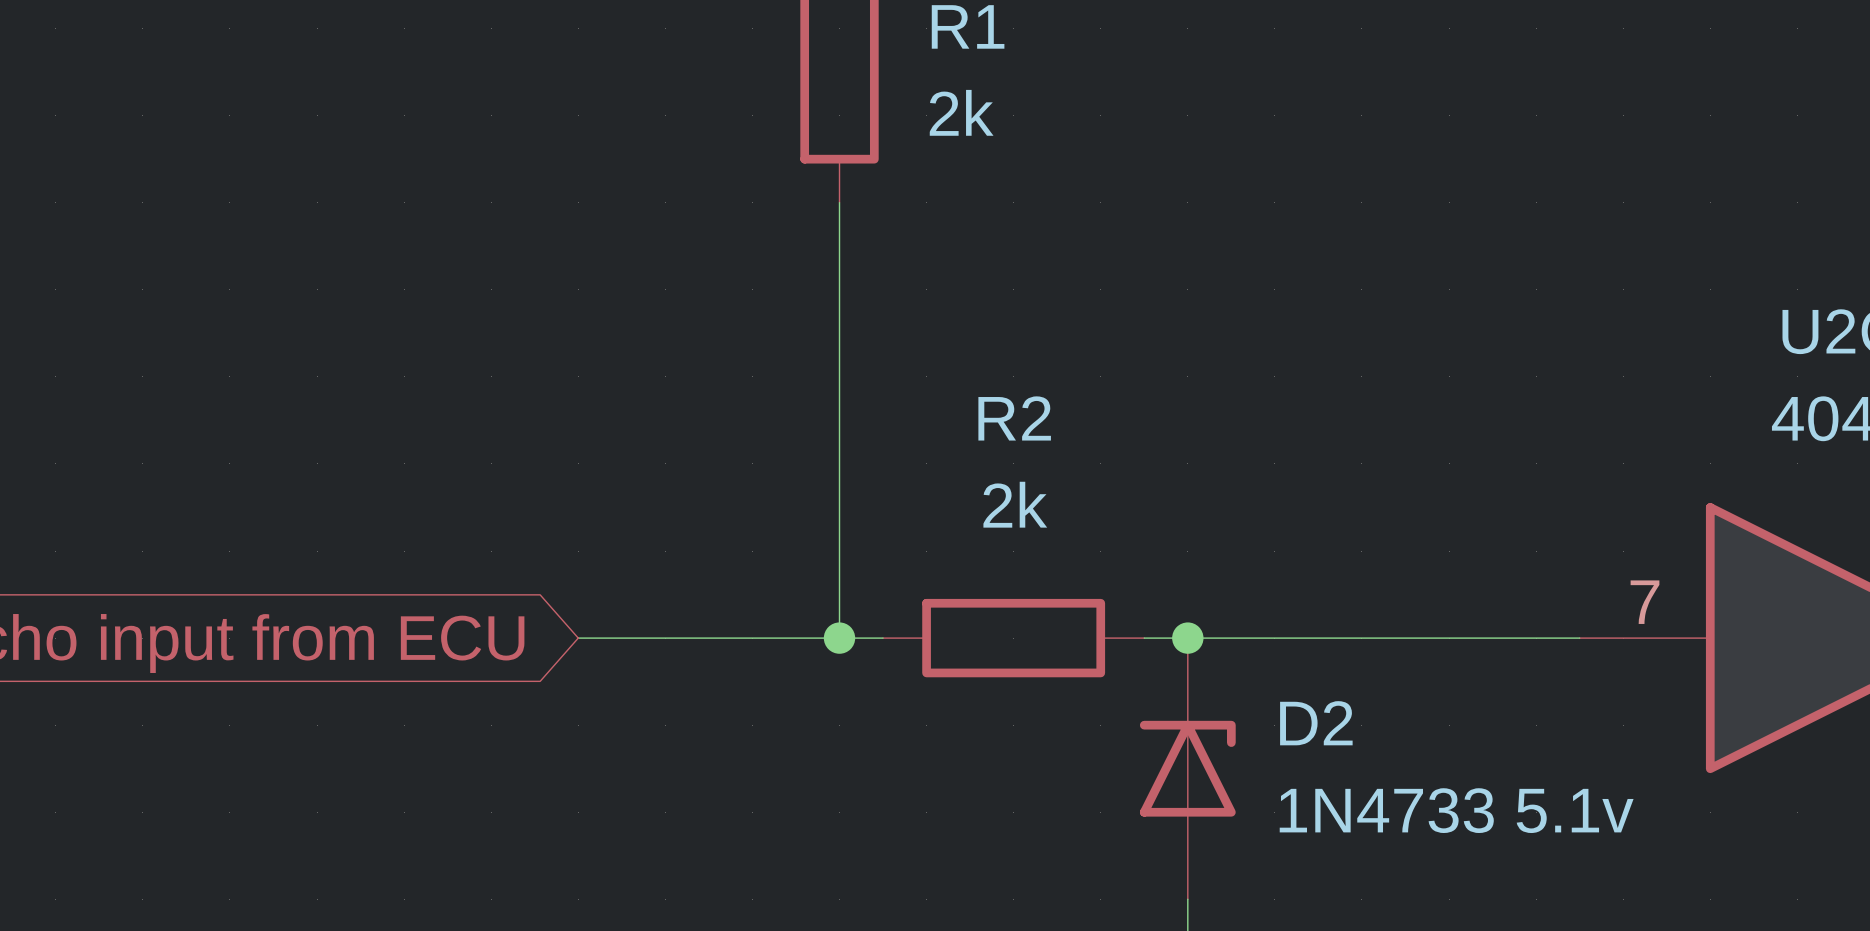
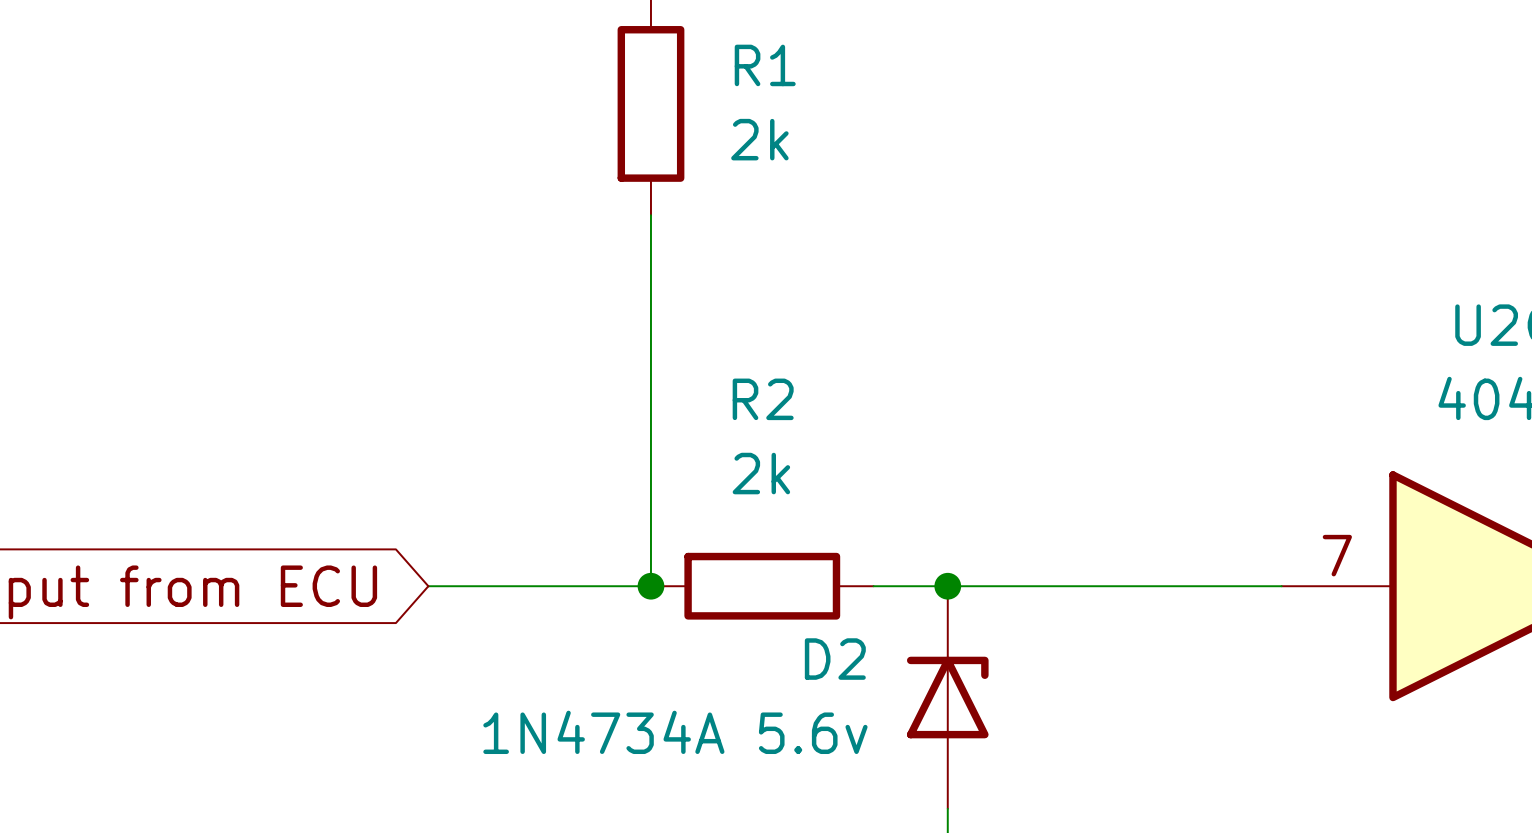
R2 position: (1013, 638) -> (762, 586)
D2 name position: D2 (1316, 723) -> D2 (835, 659)
D2 value: 1N4733 5.1v (1456, 810) -> 1N4734A 5.6v (675, 732)

